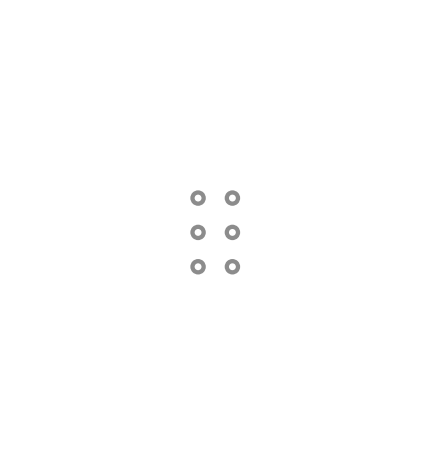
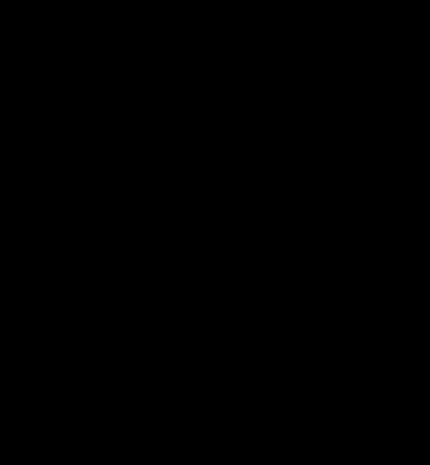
part: (215, 232) -> none

